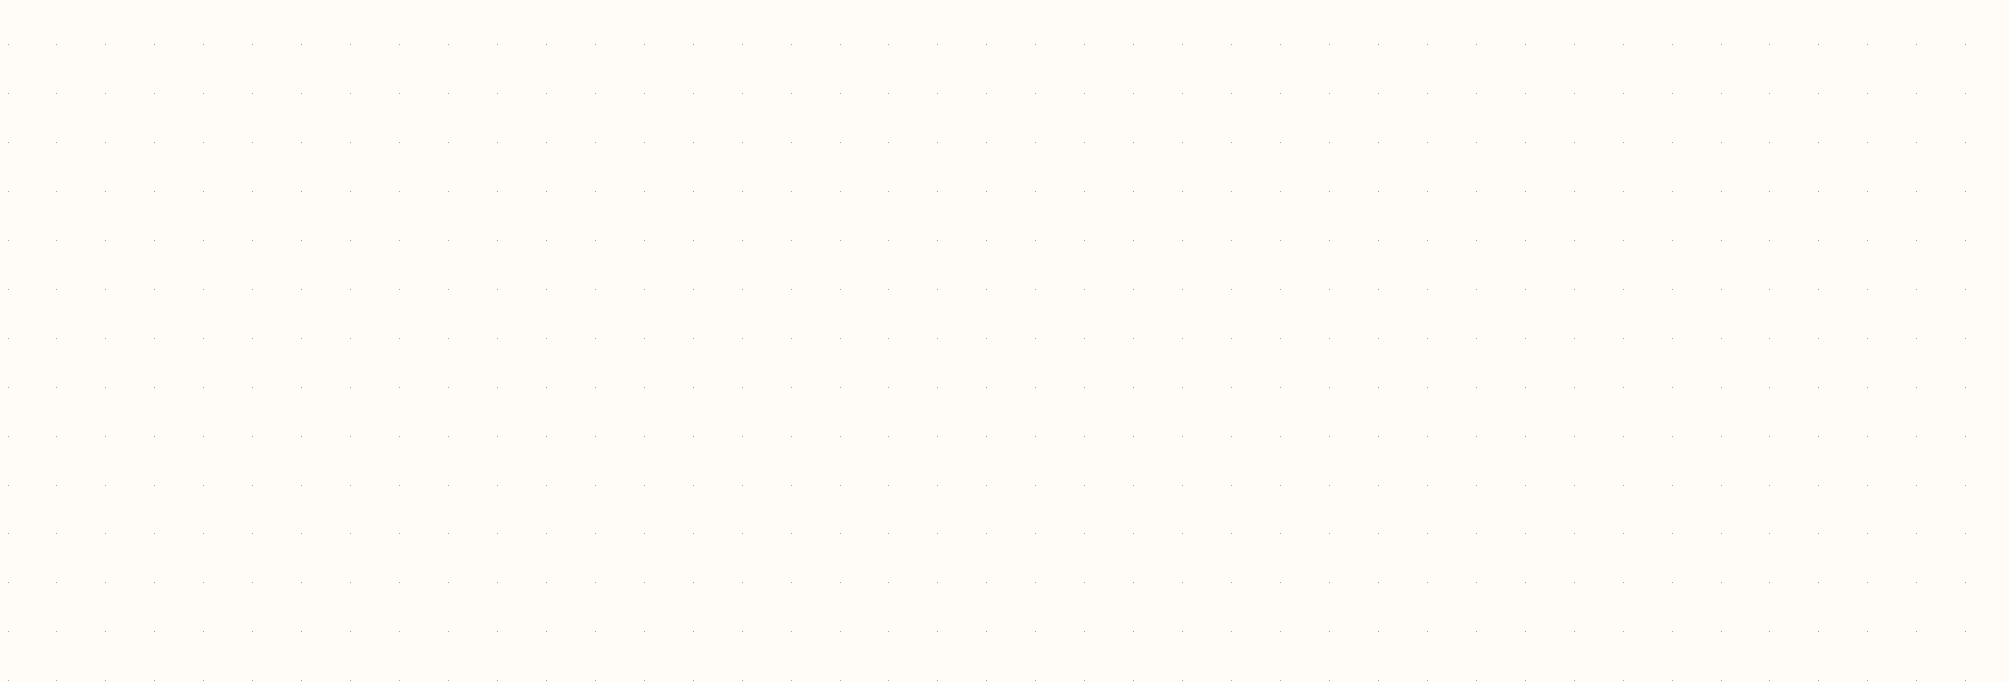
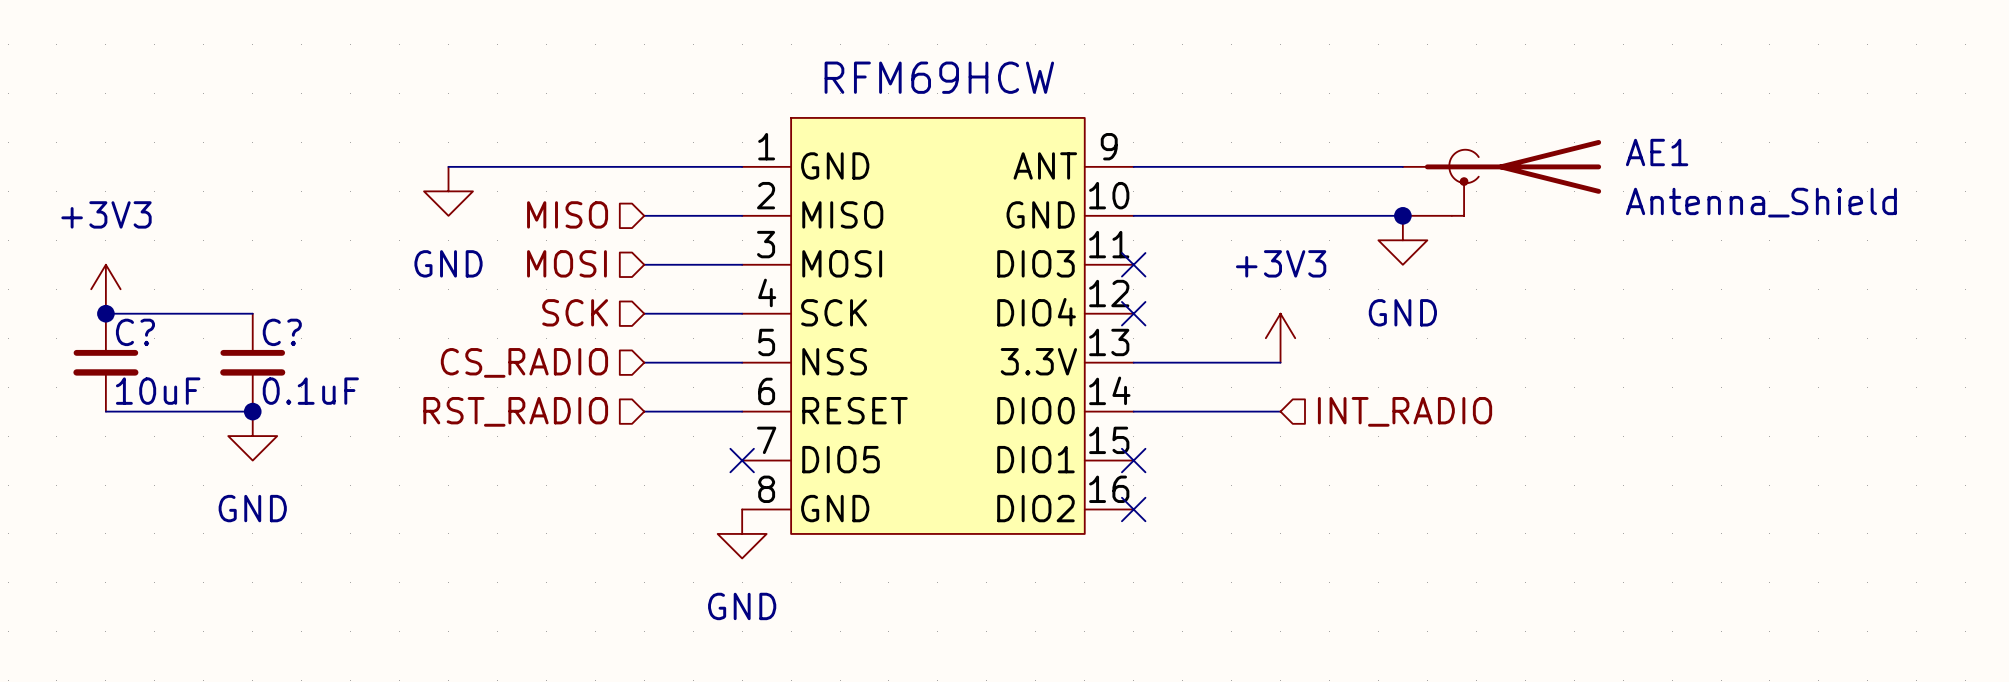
wire: none -> (448, 166) (742, 166)
wire: none -> (1133, 166) (1402, 166)
AE1: none -> Antenna_Shield (1501, 177)
power symbol: none -> GND (448, 191)
hierarchical label: none -> MISO (567, 214)
wire: none -> (644, 215) (742, 215)
wire: none -> (1133, 215) (1402, 215)
junction: none -> (1402, 215)
power symbol: none -> GND (1402, 240)
hierarchical label: none -> MOSI (566, 263)
wire: none -> (644, 264) (742, 264)
no-connect mark: none -> (1133, 264)
power symbol: none -> +3V3 (105, 289)
hierarchical label: none -> SCK (575, 312)
wire: none -> (105, 313) (252, 313)
junction: none -> (105, 313)
wire: none -> (644, 313) (742, 313)
no-connect mark: none -> (1133, 313)
part: none -> RFM69HCW (937, 325)
power symbol: none -> +3V3 (1280, 338)
C?: none -> 10uF (105, 362)
C?: none -> 0.1uF (252, 362)
hierarchical label: none -> CS_RADIO (524, 362)
wire: none -> (644, 362) (742, 362)
wire: none -> (1133, 362) (1280, 362)
wire: none -> (105, 411) (252, 411)
junction: none -> (252, 411)
hierarchical label: none -> RST_RADIO (515, 411)
wire: none -> (644, 411) (742, 411)
wire: none -> (1133, 411) (1280, 411)
hierarchical label: none -> INT_RADIO (1405, 411)
power symbol: none -> GND (252, 436)
no-connect mark: none -> (742, 460)
no-connect mark: none -> (1133, 460)
no-connect mark: none -> (1133, 509)
power symbol: none -> GND (742, 533)

